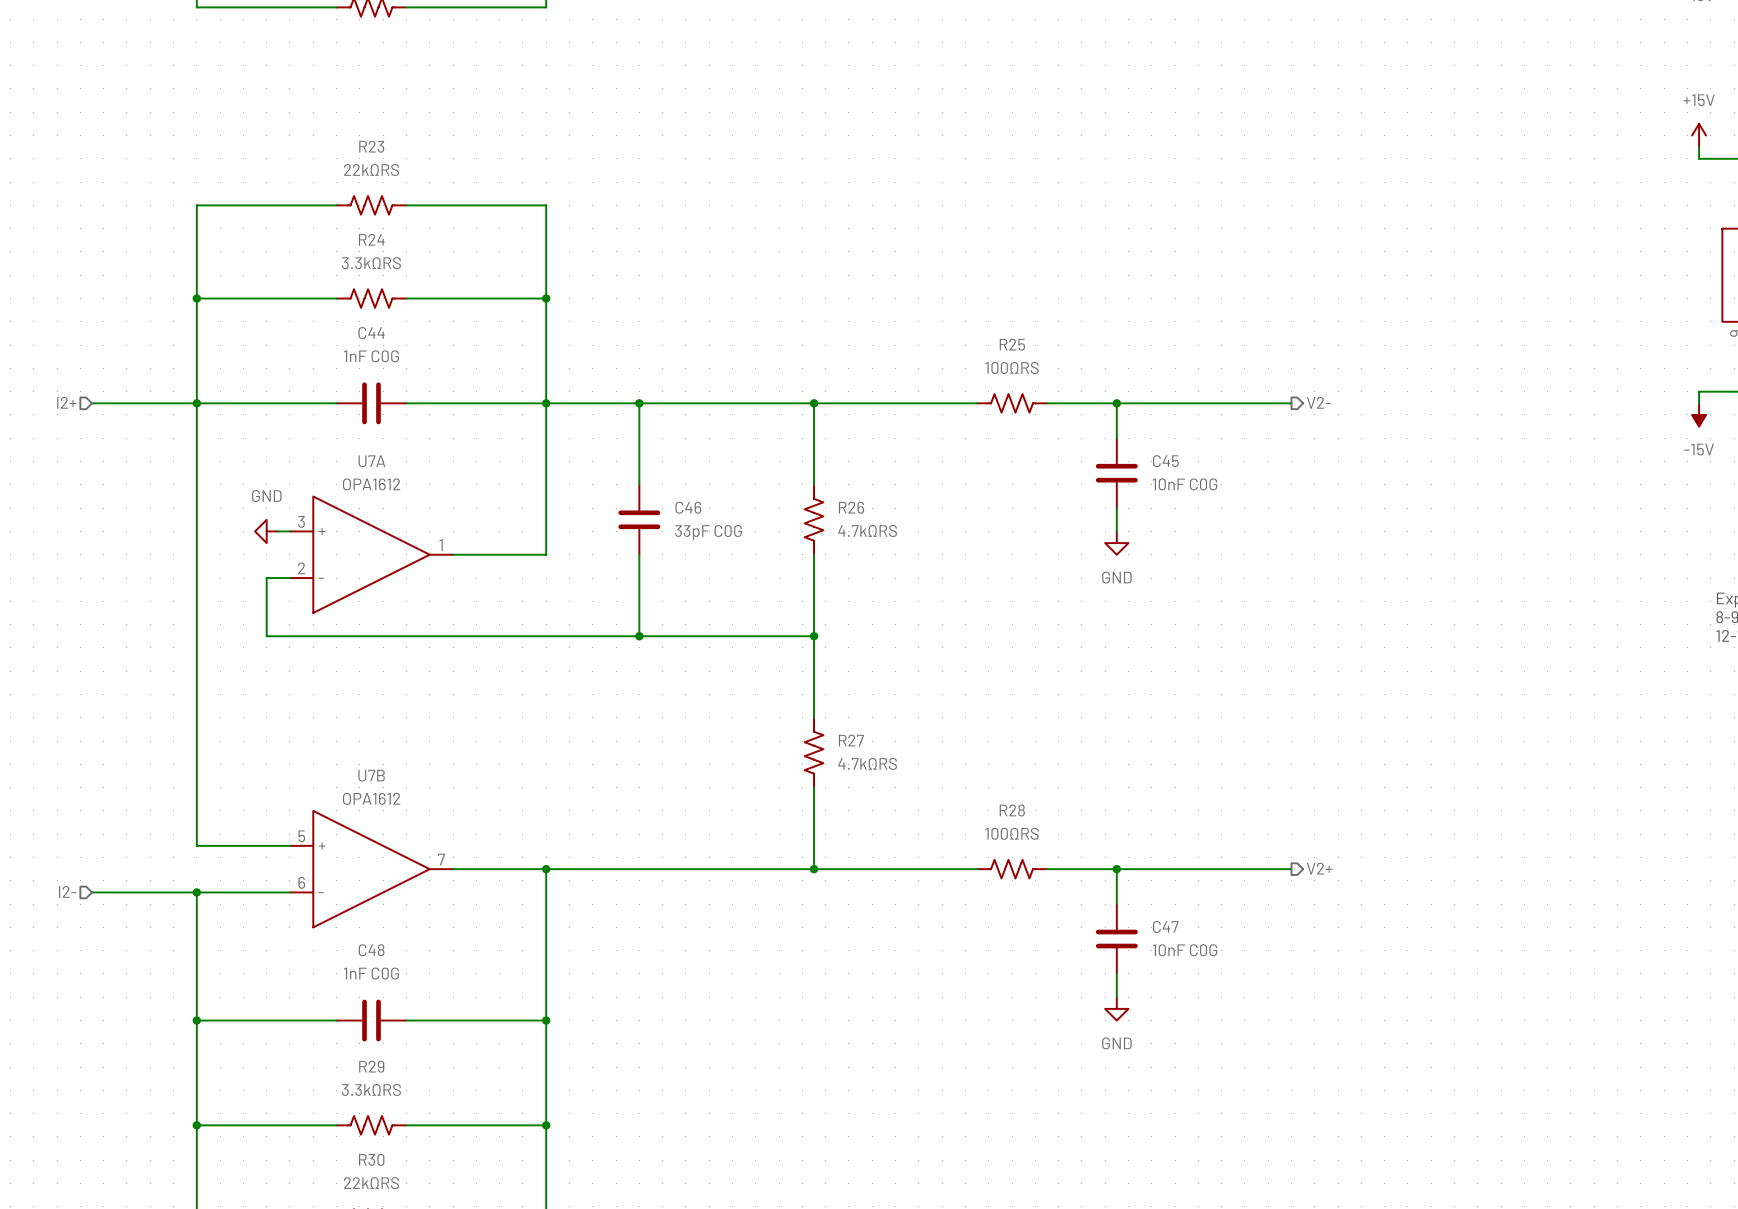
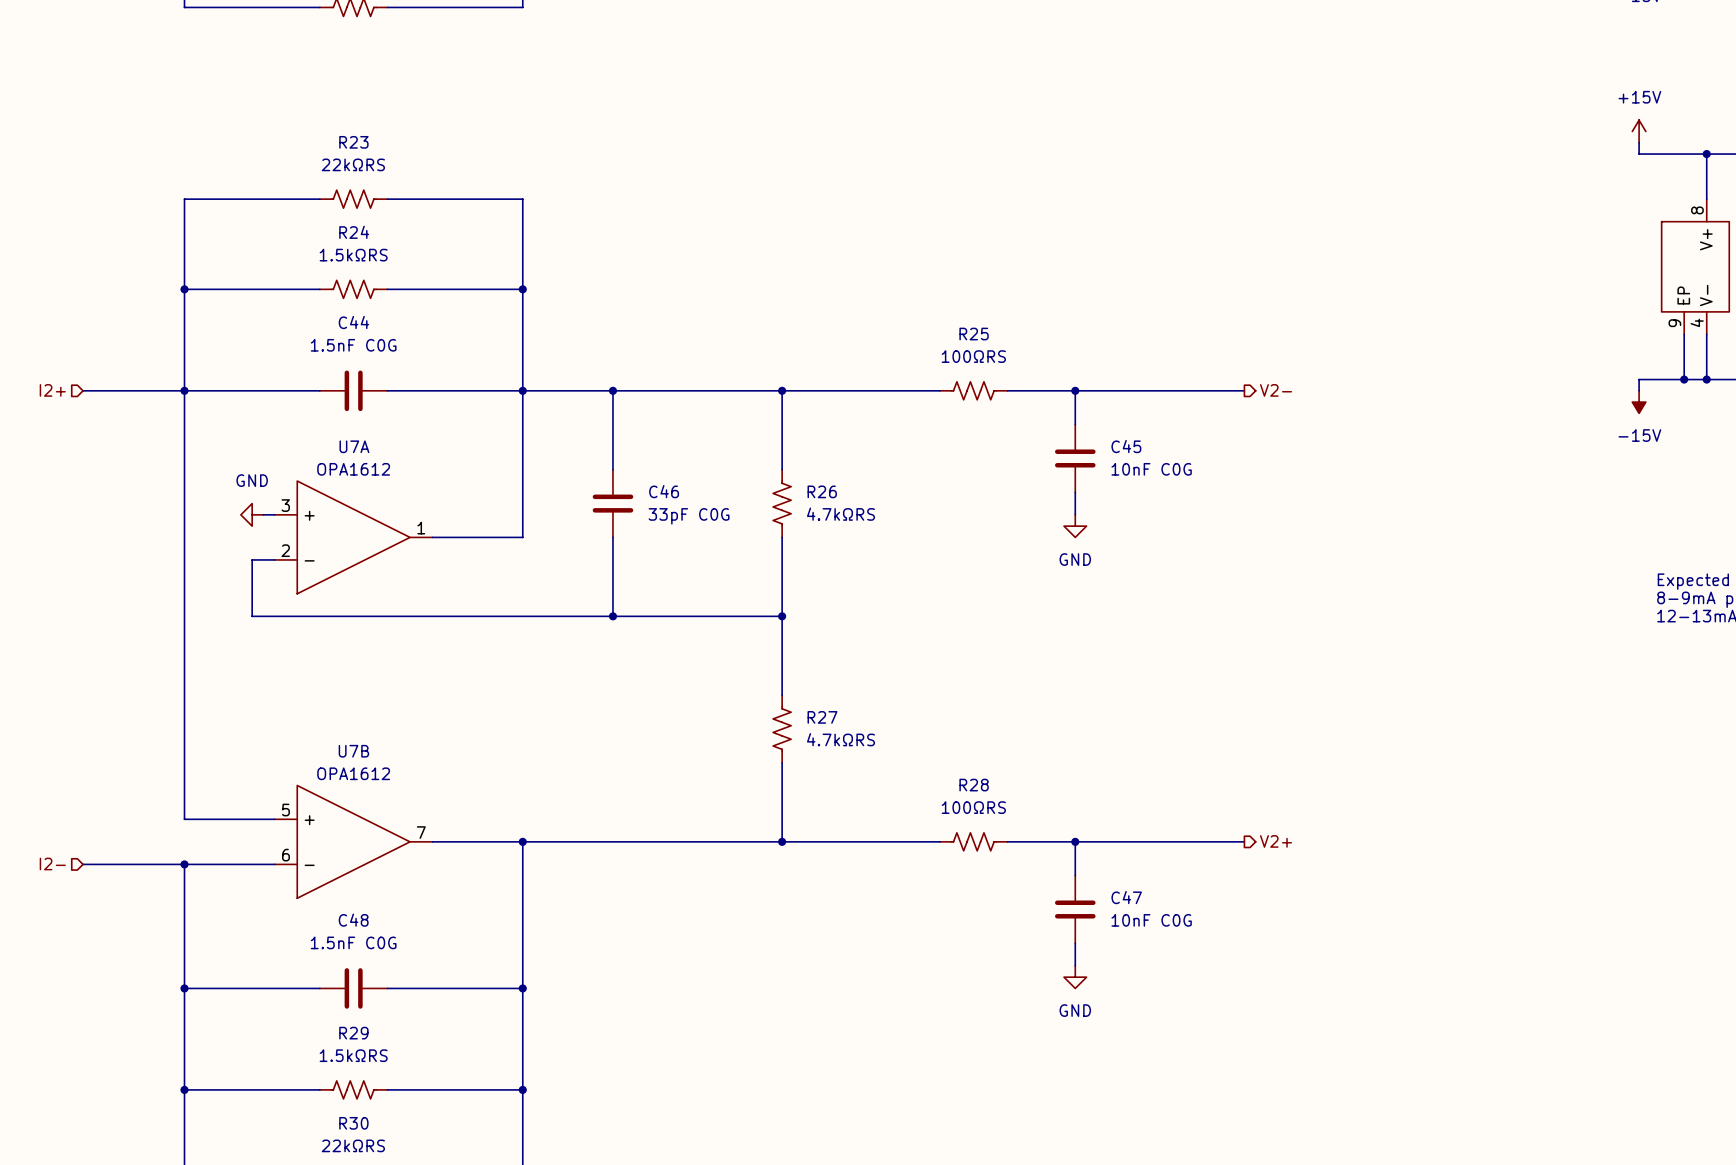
R24 value: 3.3kΩRS (371, 263) -> 1.5kΩRS (353, 255)
C44 value: 1nF C0G (371, 356) -> 1.5nF C0G (353, 345)
C48 value: 1nF C0G (371, 973) -> 1.5nF C0G (353, 942)
R29 value: 3.3kΩRS (371, 1089) -> 1.5kΩRS (353, 1055)

